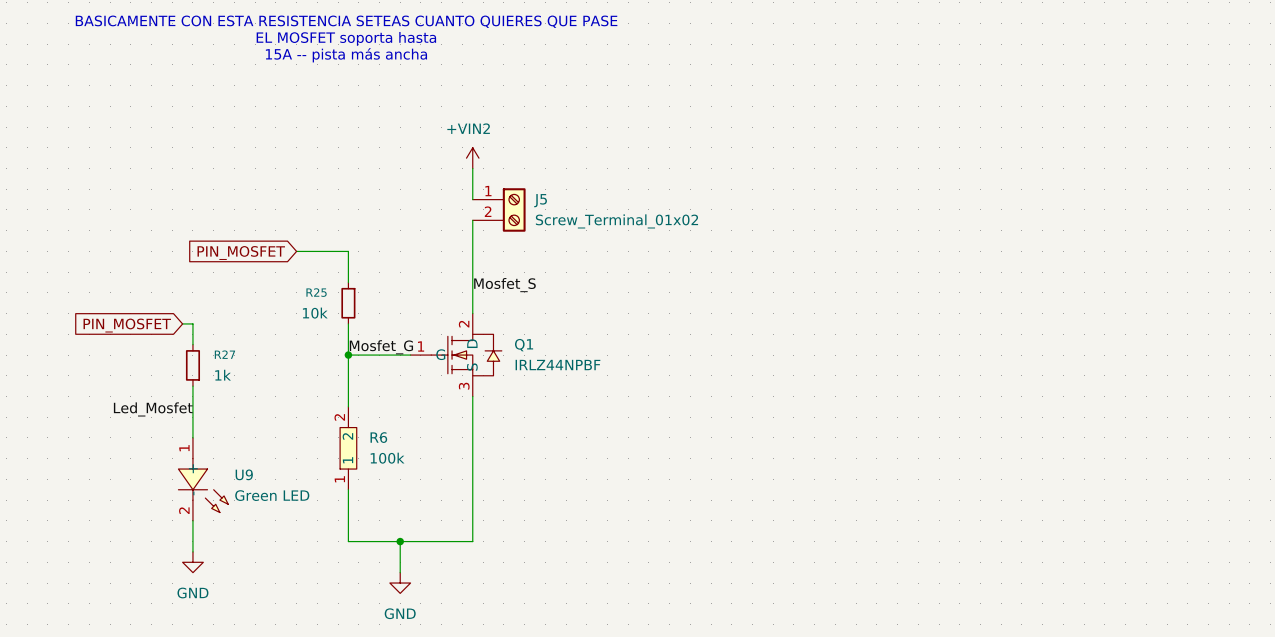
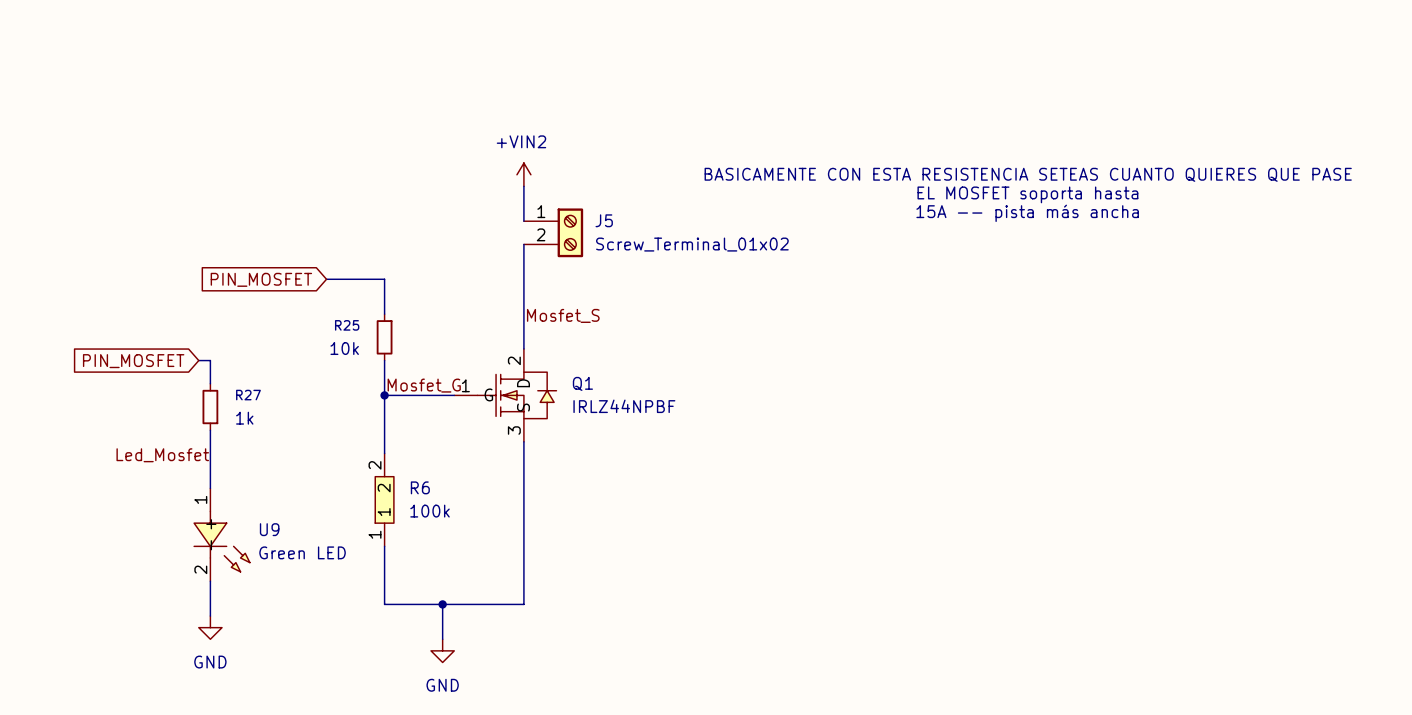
text: BASICAMENTE CON ESTA RESISTENCIA SETEAS CUANTO QUIERES QUE PASE (346, 21) -> none
text: EL MOSFET soporta hasta (346, 38) -> none
text: 15A -- pista más ancha (346, 55) -> none
text: none -> BASICAMENTE CON ESTA RESISTENCIA SETEAS CUANTO QUIERES QUE PASE (1028, 174)
text: none -> EL MOSFET soporta hasta (1027, 194)
text: none -> 15A -- pista más ancha (1027, 213)

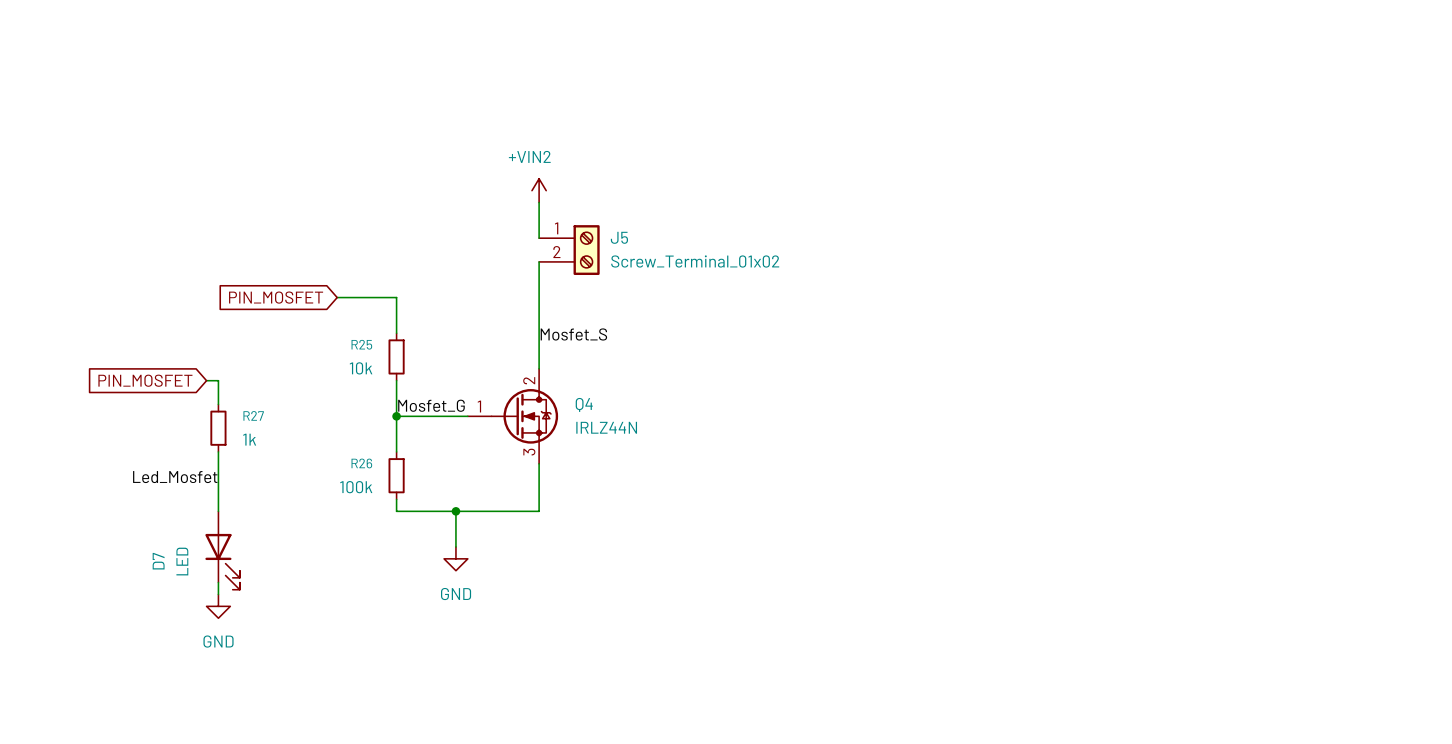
text: BASICAMENTE CON ESTA RESISTENCIA SETEAS CUANTO QUIERES QUE PASE (1028, 174) -> none
text: EL MOSFET soporta hasta (1027, 194) -> none
text: 15A -- pista más ancha (1027, 213) -> none
Q4: none -> IRLZ44N (512, 416)
Q1: IRLZ44NPBF (505, 395) -> none
wire: (384, 430) (384, 453) -> none
R26: none -> 100k (396, 475)
junction: none -> (455, 511)
wire: (523, 488) (523, 604) (384, 604) (384, 546) -> (539, 511) (396, 511) (396, 499)
R6: 100k (384, 499) -> none
D7: none -> LED (222, 550)
U9: Green LED (222, 534) -> none
wire: (210, 581) (210, 616) -> none
wire: (442, 604) (442, 639) -> (455, 511) (455, 546)
junction: (442, 604) -> none
power symbol position: GND (210, 627) -> GND (218, 606)
power symbol position: GND (442, 650) -> GND (455, 558)

